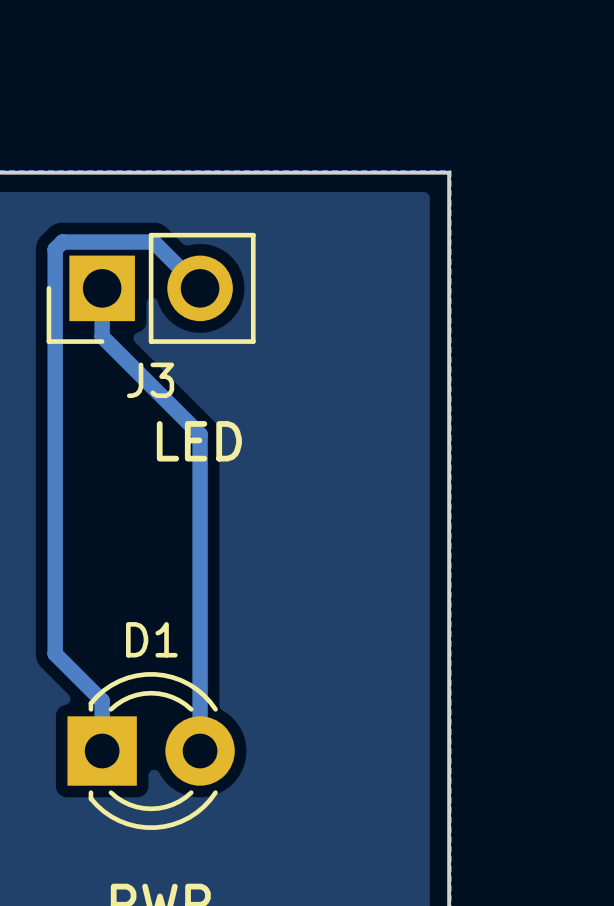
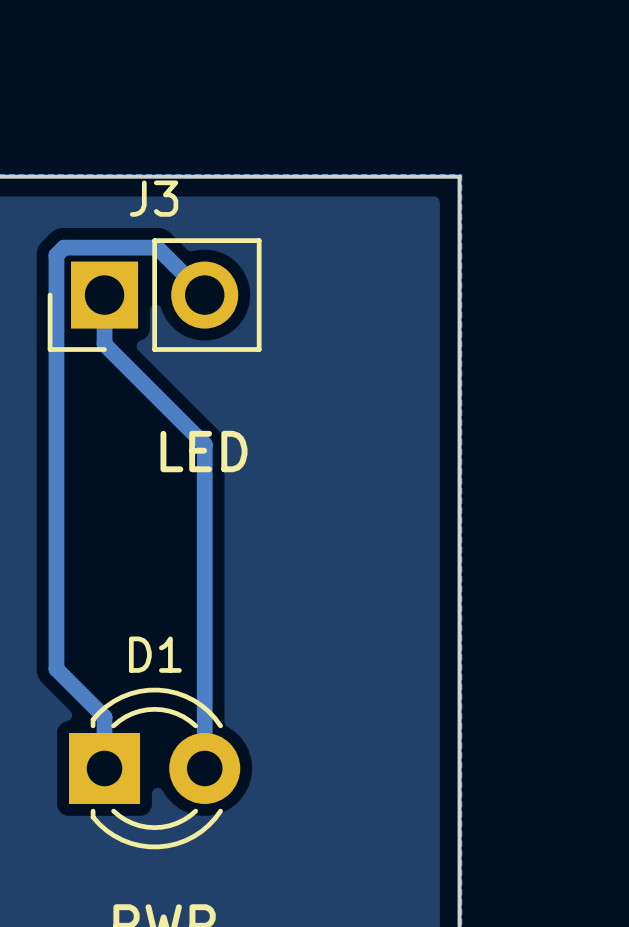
J3 name position: J3 (150, 380) -> J3 (154, 198)

